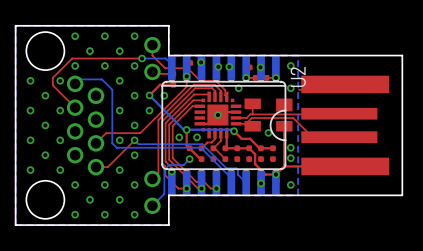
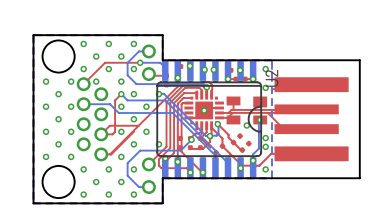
top track: (152, 45) (152, 55) (165, 68) -> none
bottom track: none -> (148, 51) (138, 51) (127, 62) (127, 75) (136, 84) (203, 84) (206, 87)
top track: (100, 58) (72, 58) (52, 77) (52, 85) (75, 107) -> (105, 62) (83, 84)
top track: (165, 68) (184, 68) (189, 69) (200, 80) (215, 80) (225, 90) (226, 96) -> (201, 84) (204, 81) (209, 81) (212, 85) (211, 95)
via: none -> (96, 81)
bottom track: (75, 83) (79, 79) (101, 79) (112, 89) (112, 143) (116, 147) (200, 147) (231, 178) -> none
top track: (173, 84) (160, 84) (149, 95) -> none
via position: (238, 88) -> (206, 87)
top track: none -> (121, 94) (115, 100) (115, 131) (112, 134) (101, 134)
via: none -> (121, 94)
bottom track: (149, 95) (183, 129) (234, 131) -> none
via: (149, 95) -> none
bottom track: none -> (157, 93) (164, 93) (206, 136) (216, 135) (218, 133) (218, 124)
top track: (173, 105) (158, 120) (158, 172) -> (166, 102) (166, 146) (153, 159)
top track: (177, 105) (161, 121) (161, 163) (165, 166) (165, 175) (178, 188) (186, 188) -> (170, 102) (170, 148) (158, 159) (158, 165) (161, 168) (186, 168) (190, 171)
top track: (182, 106) (165, 123) (165, 161) (171, 167) (171, 171) -> (174, 103) (174, 153) (165, 161)
bottom track: none -> (83, 104) (110, 104) (118, 113) (172, 113) (215, 155) (215, 163)
top track: (186, 107) (169, 124) (169, 159) (198, 188) (201, 188) -> (177, 103) (177, 123)
top track: (191, 107) (172, 126) (172, 158) (196, 182) (204, 182) (210, 188) (216, 188) -> (181, 104) (181, 151) (202, 171)
top track: (284, 126) (284, 166) -> none
bottom track: none -> (260, 119) (258, 148) (253, 154) (253, 160)
via: none -> (260, 119)
via: (186, 129) -> none
via: (179, 137) -> none
via: (197, 137) -> none
top track: (241, 138) (250, 138) (259, 148) (272, 148) -> (224, 130) (228, 137) (242, 150)
bottom track: (134, 140) (138, 144) (202, 144) (226, 168) (236, 168) (237, 174) (246, 182) -> (121, 94) (127, 100) (165, 100) (228, 163) (228, 167)
via: (134, 140) -> none
via: none -> (146, 131)
top track: (186, 145) (201, 159) -> (177, 136) (177, 161)
top track: none -> (209, 136) (209, 141) (202, 148) (191, 148)
via: none -> (209, 136)
top track: (225, 148) (249, 148) (255, 154) (255, 164) (265, 174) (275, 174) (284, 166) -> none
via: none -> (191, 139)
part: none -> (236, 139)
part: (225, 153) -> none
part: (237, 153) -> none
part: (249, 153) -> none
part: (261, 153) -> none
part: (272, 153) -> none
via: none -> (159, 144)
part: none -> (245, 146)
bottom track: (189, 159) (183, 165) (169, 165) (164, 169) (164, 193) (152, 205) -> (191, 139) (180, 150) (140, 150) (127, 163) (127, 175) (138, 187) (148, 187)
via: (189, 159) -> none
part: none -> (219, 149)
top track: (297, 166) (284, 166) -> (271, 153) (259, 165) (242, 165) (222, 146) (222, 138) (211, 127)
via: none -> (177, 161)
via: (186, 188) -> none

